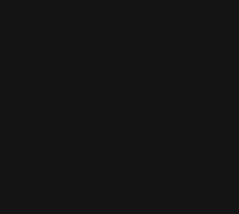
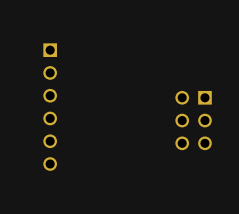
part: none -> (50, 107)
part: none -> (193, 120)

